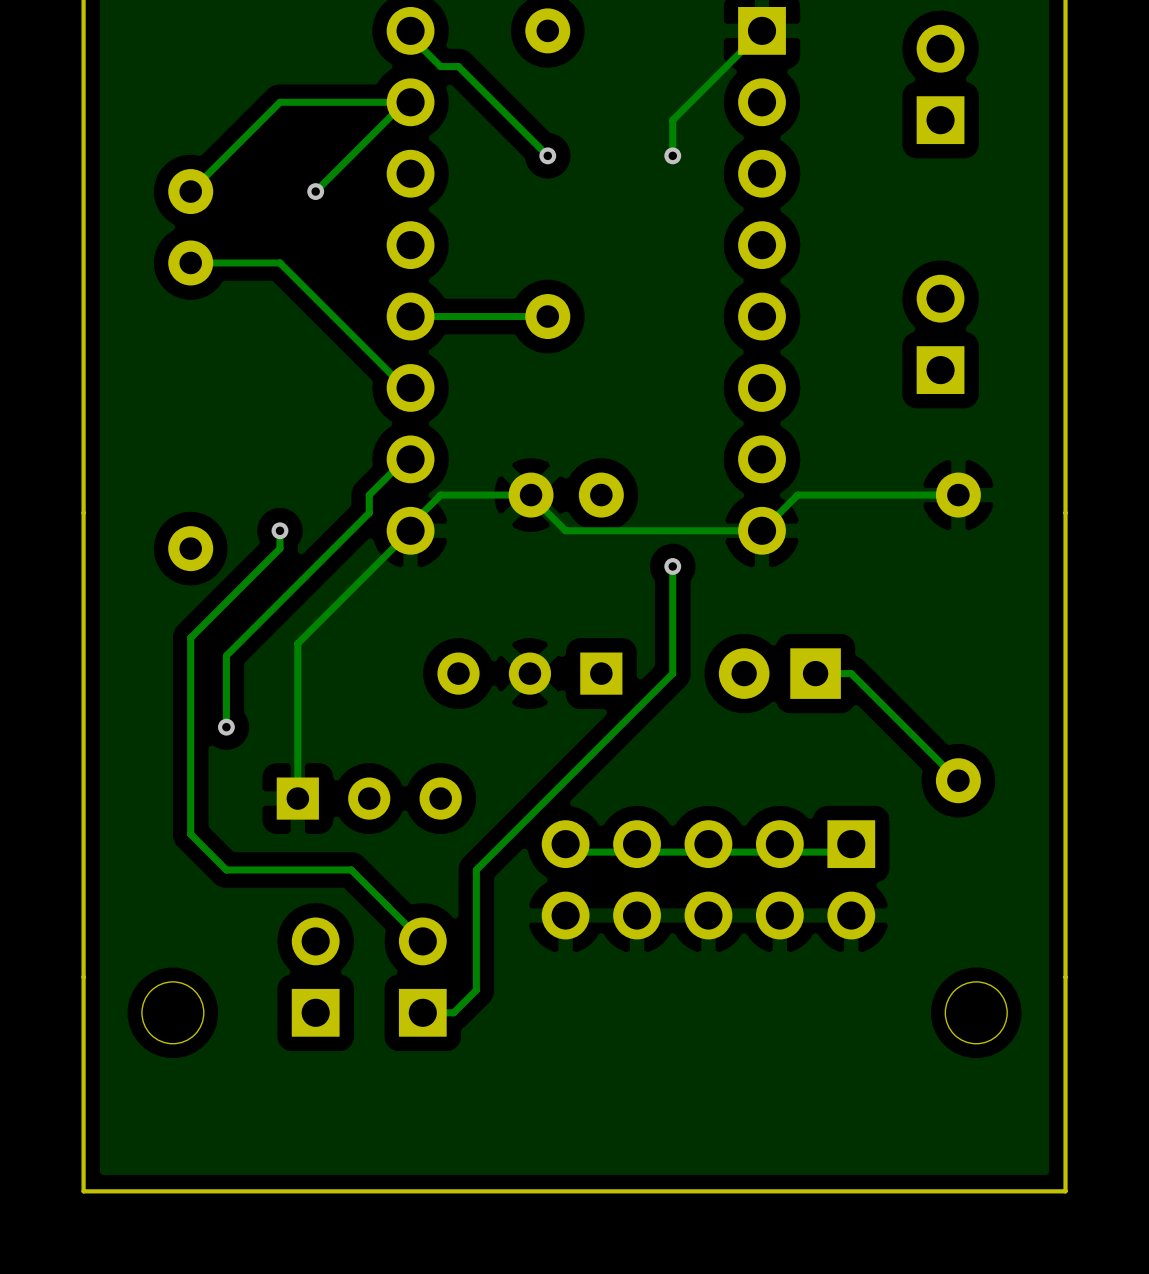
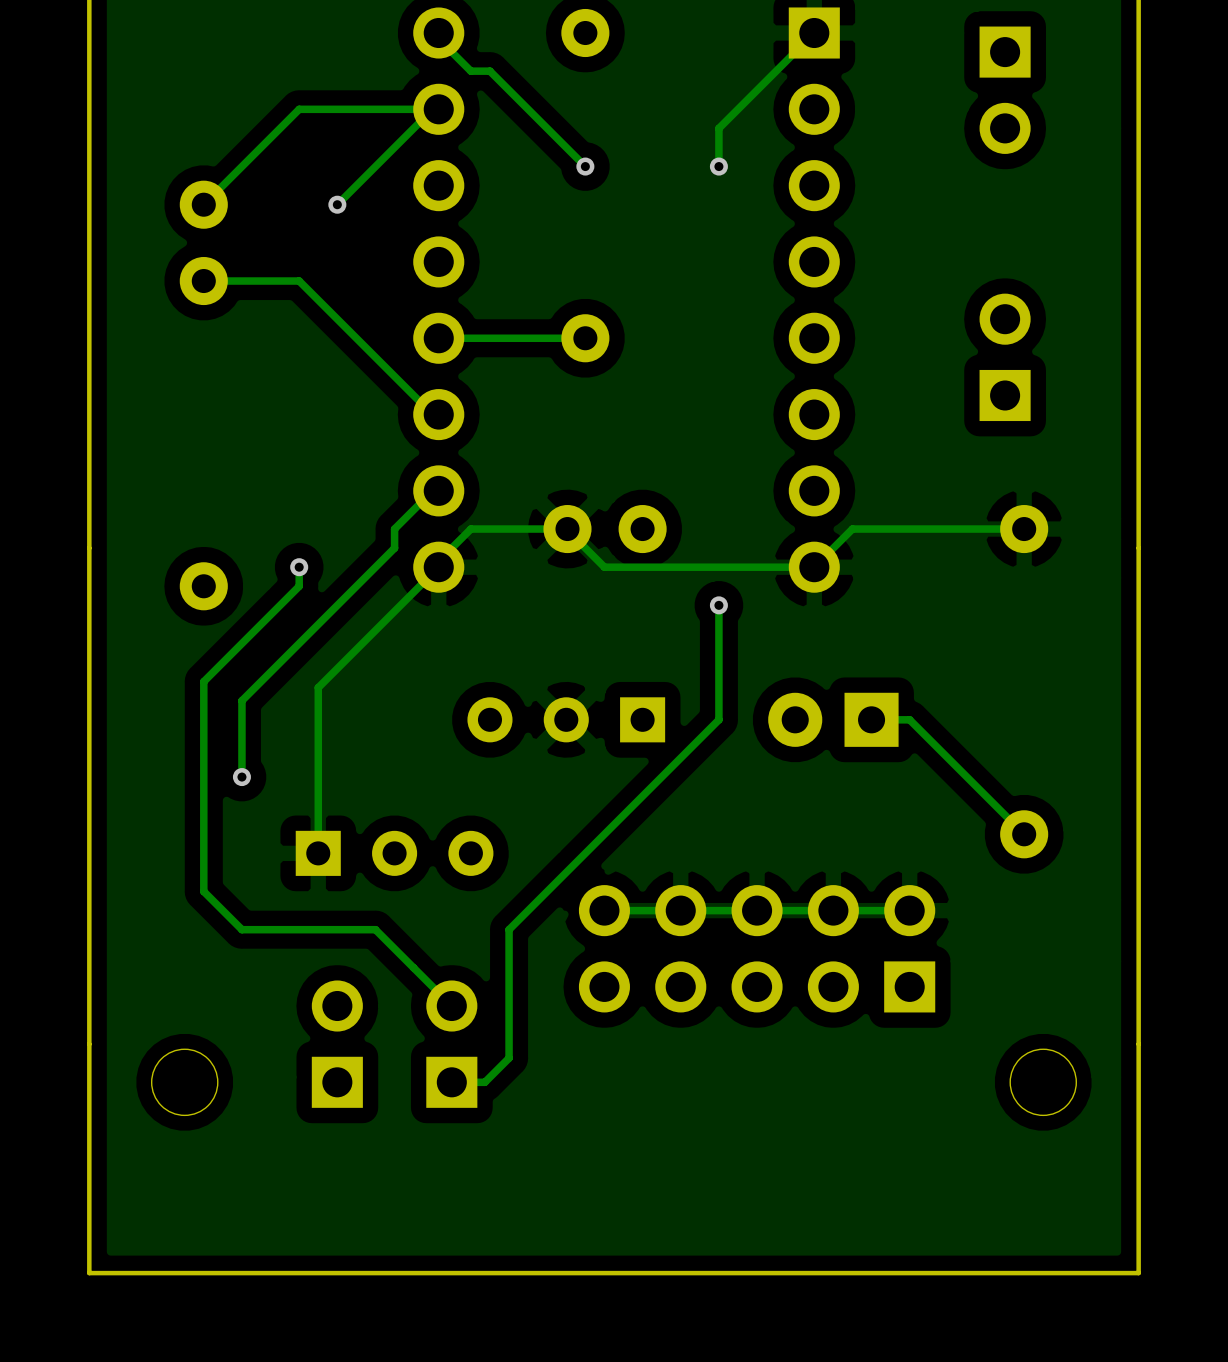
part rotation: 0° (940, 84) -> 180° (1005, 90)
part footprint: [541, 820, 876, 940] -> [578, 885, 936, 1013]

